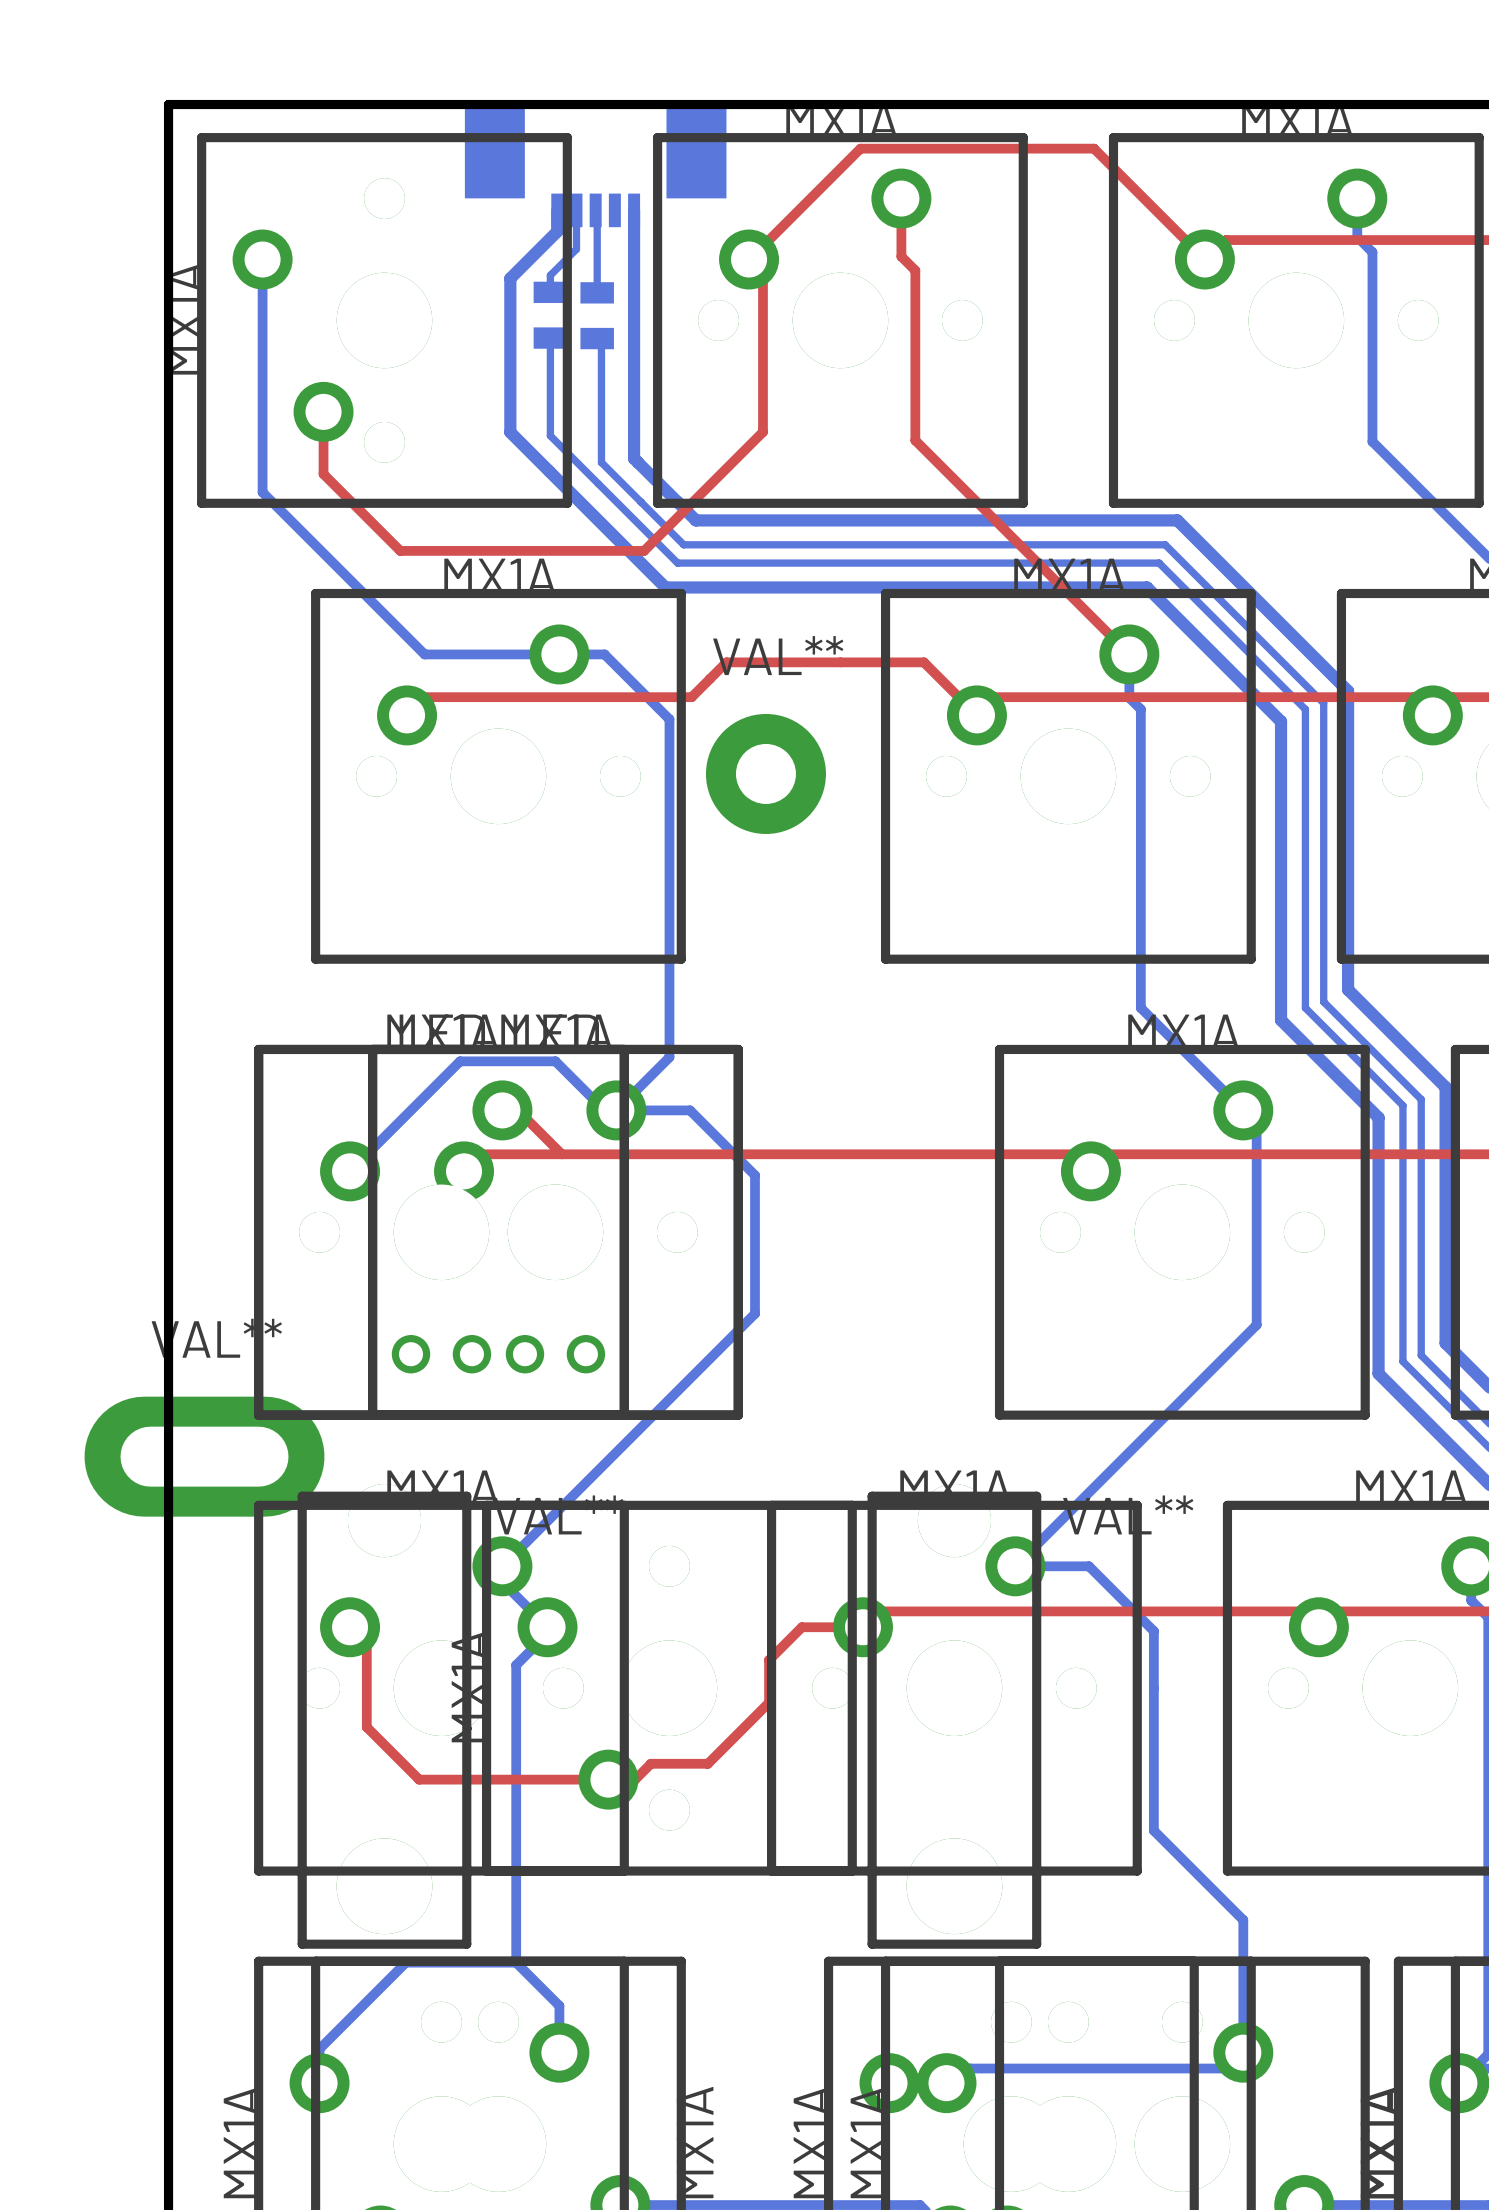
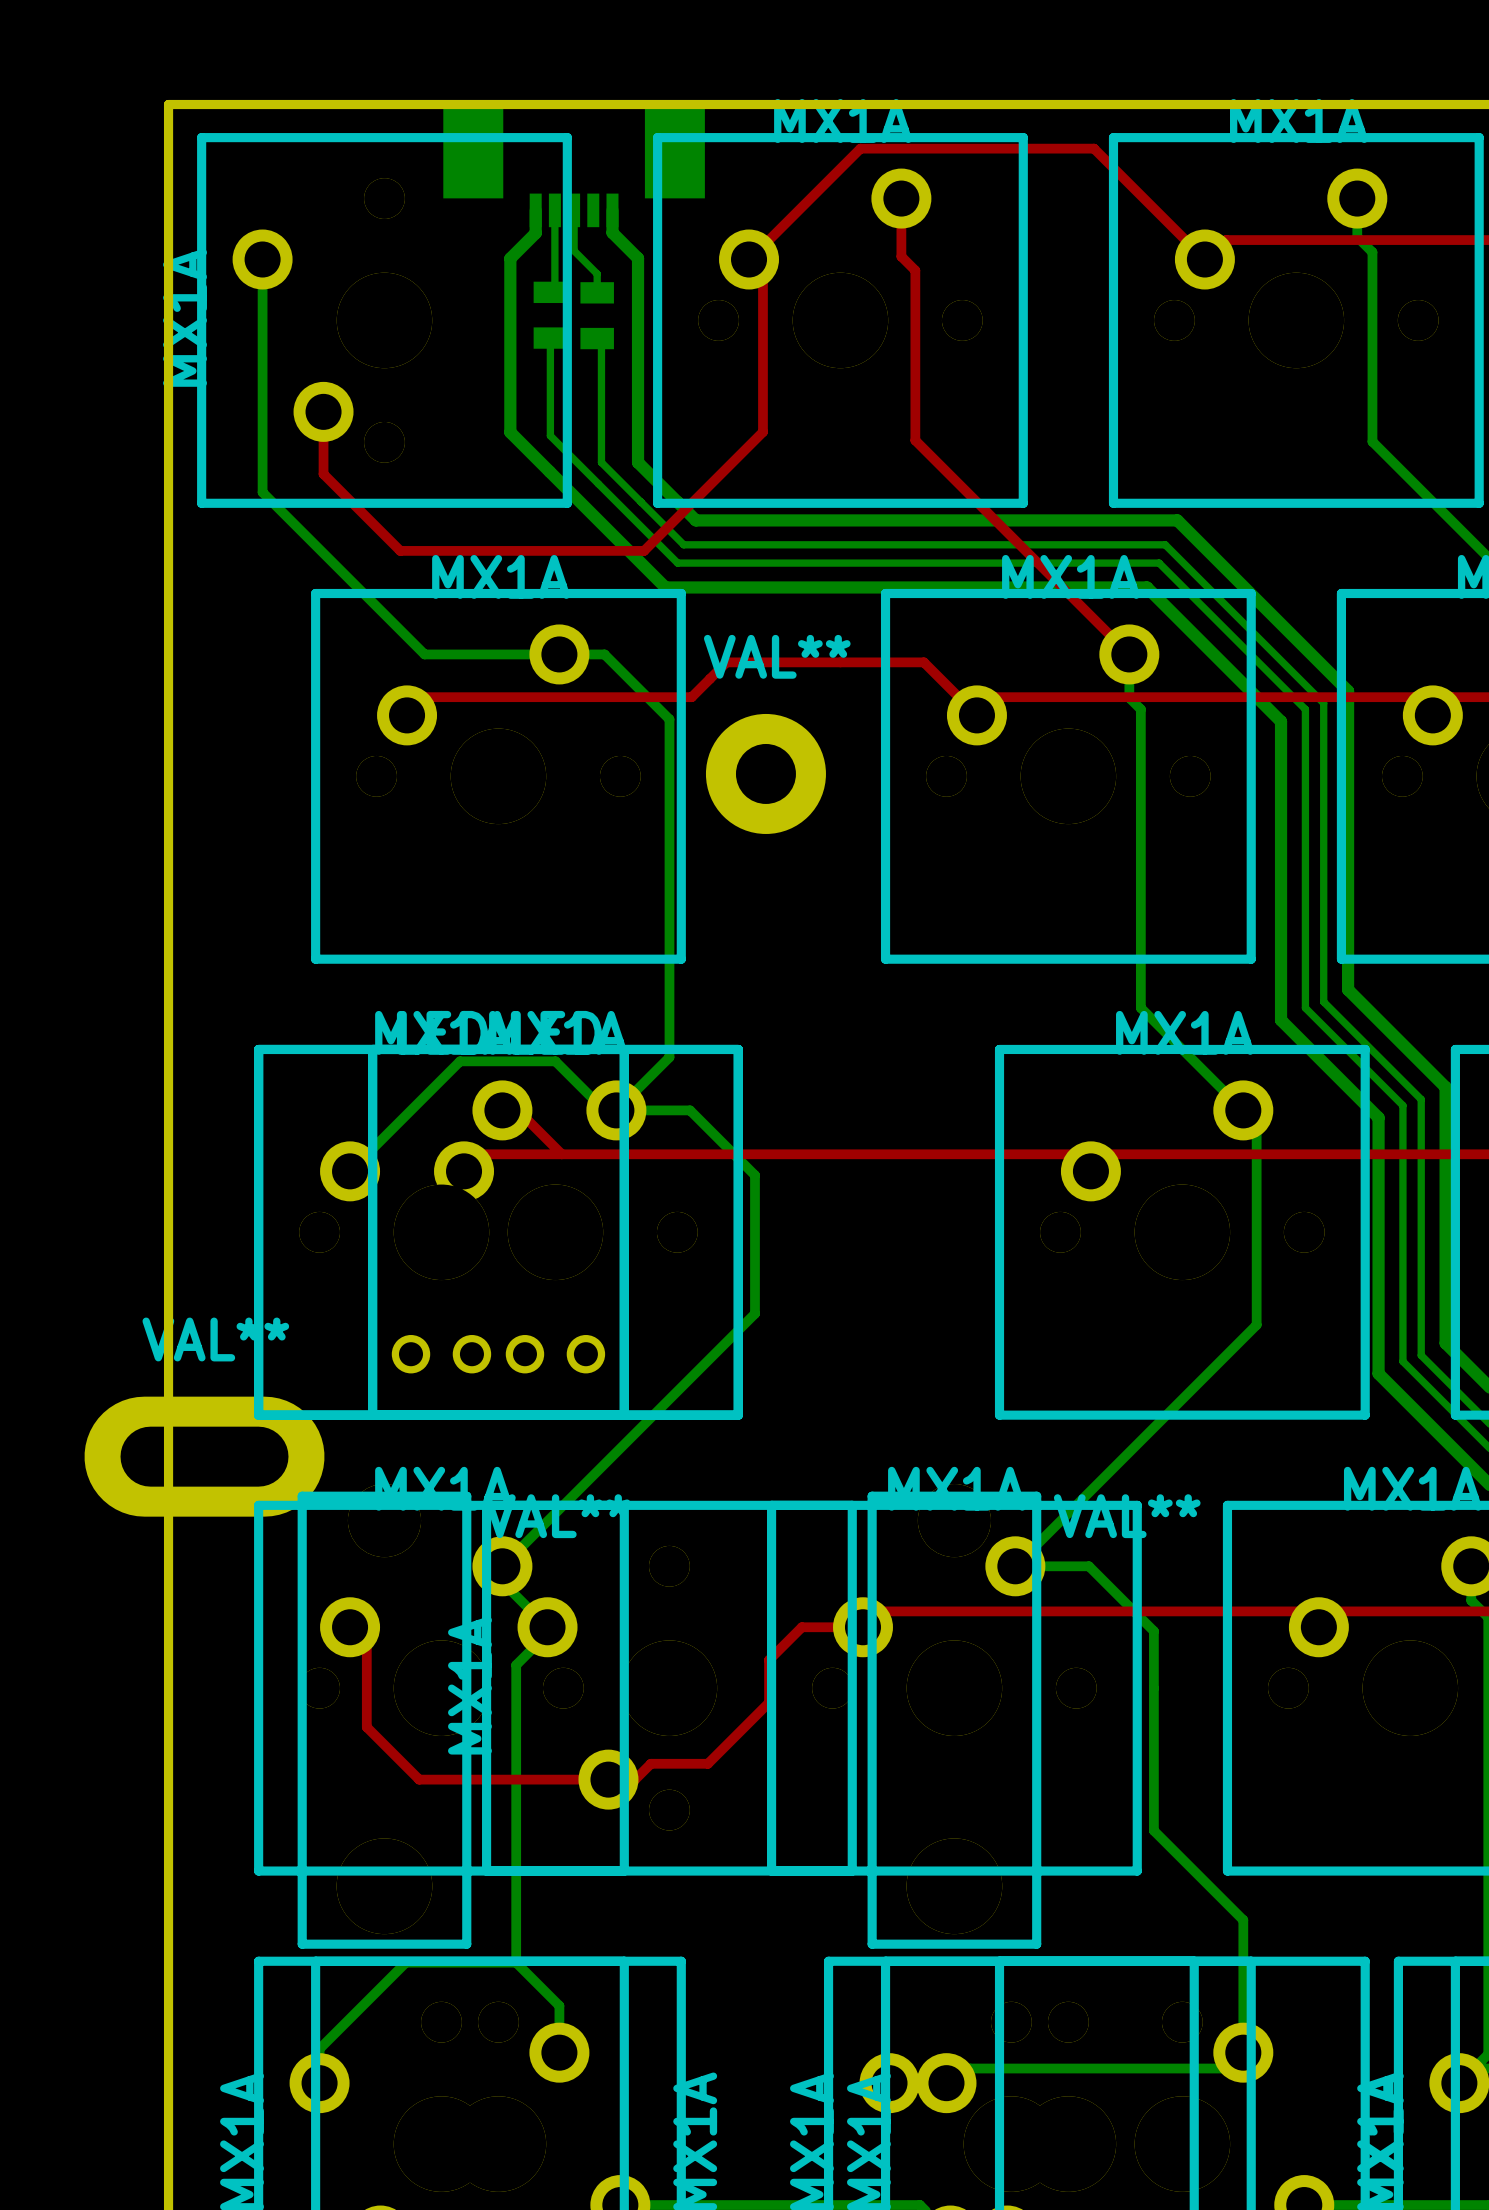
part position: (595, 167) -> (574, 167)
bottom track: (557, 210) (557, 231) (510, 278) -> (535, 210) (535, 233) (510, 258) (510, 278)
bottom track: (576, 210) (576, 249) (550, 275) (550, 292) -> (554, 210) (554, 287) (550, 292)
bottom track: (595, 210) (597, 273) -> (574, 210) (574, 250) (597, 273)
bottom track: (634, 210) (634, 458) (638, 462) -> (612, 210) (612, 232) (638, 258) (638, 462)

